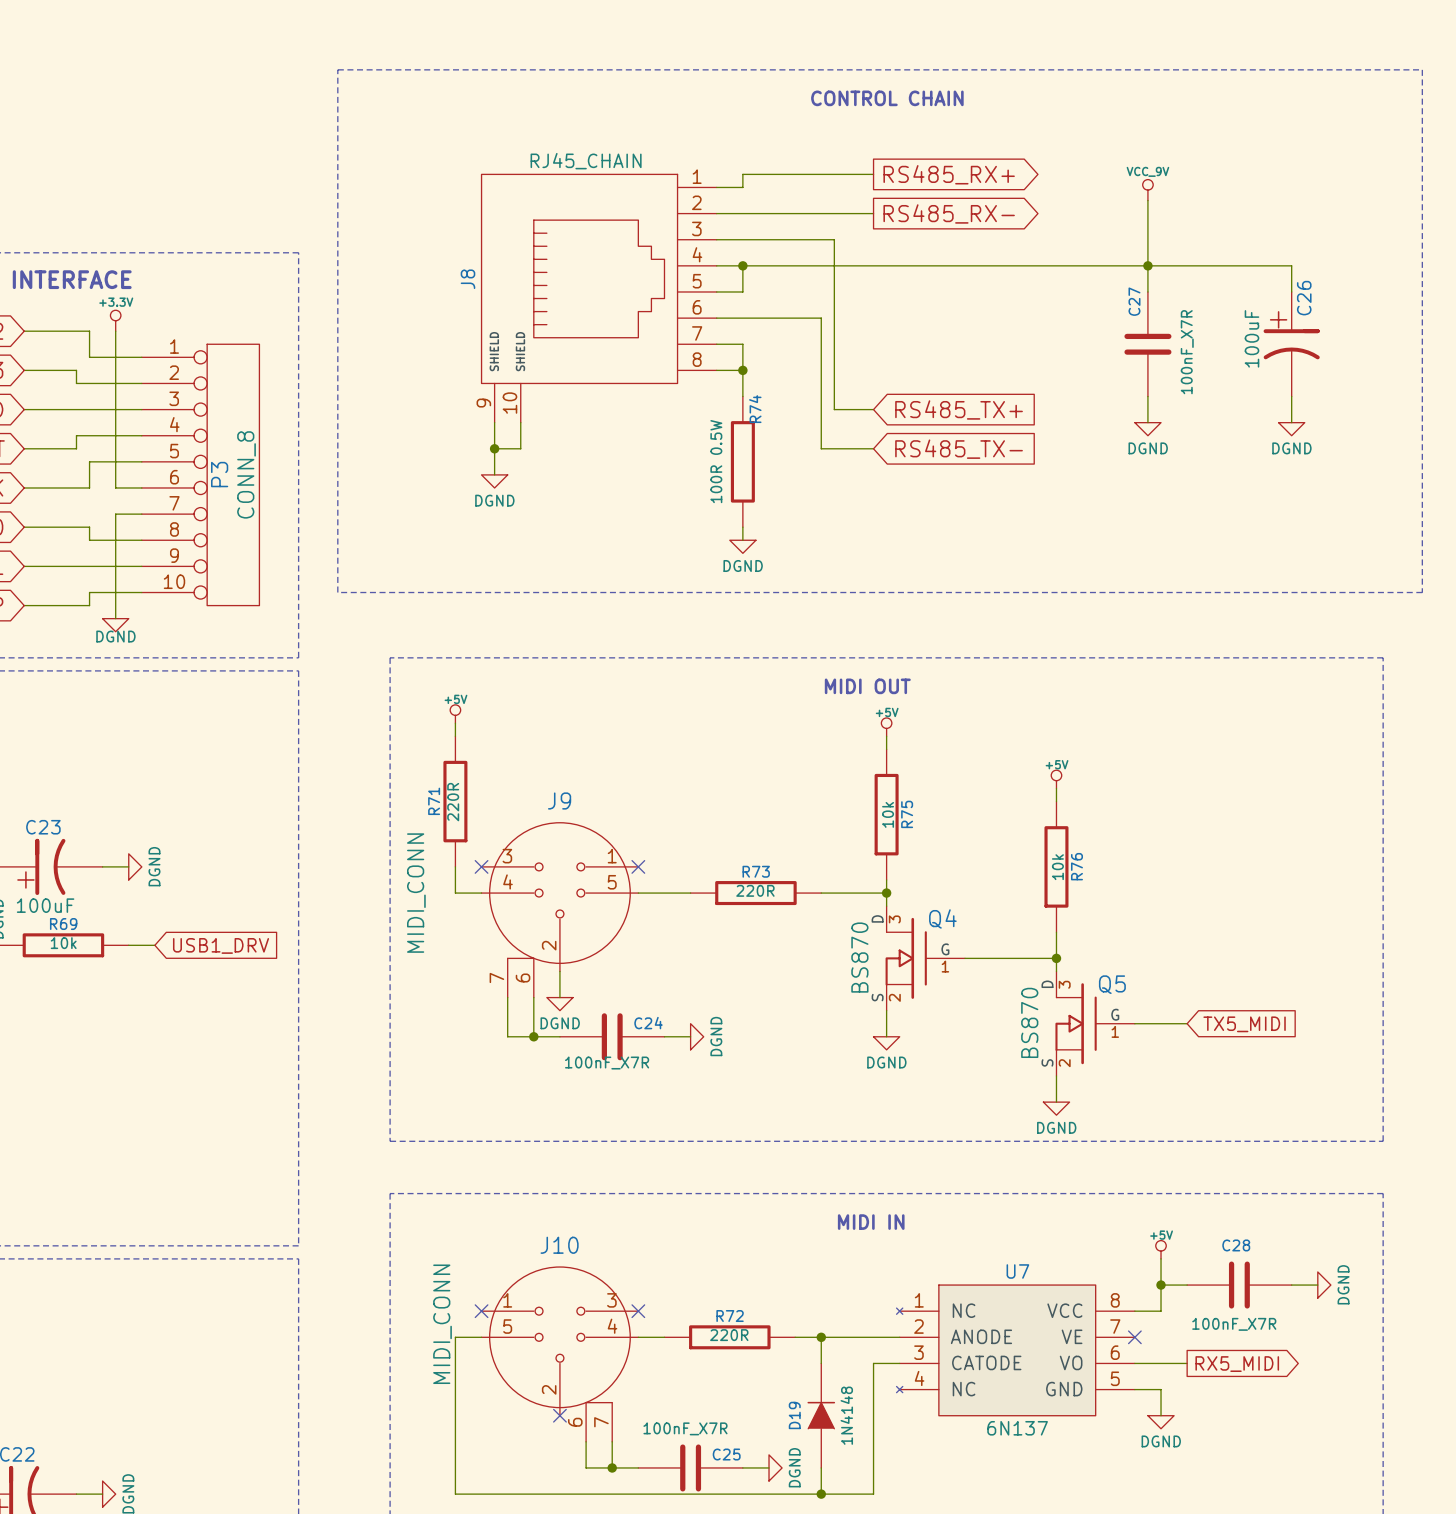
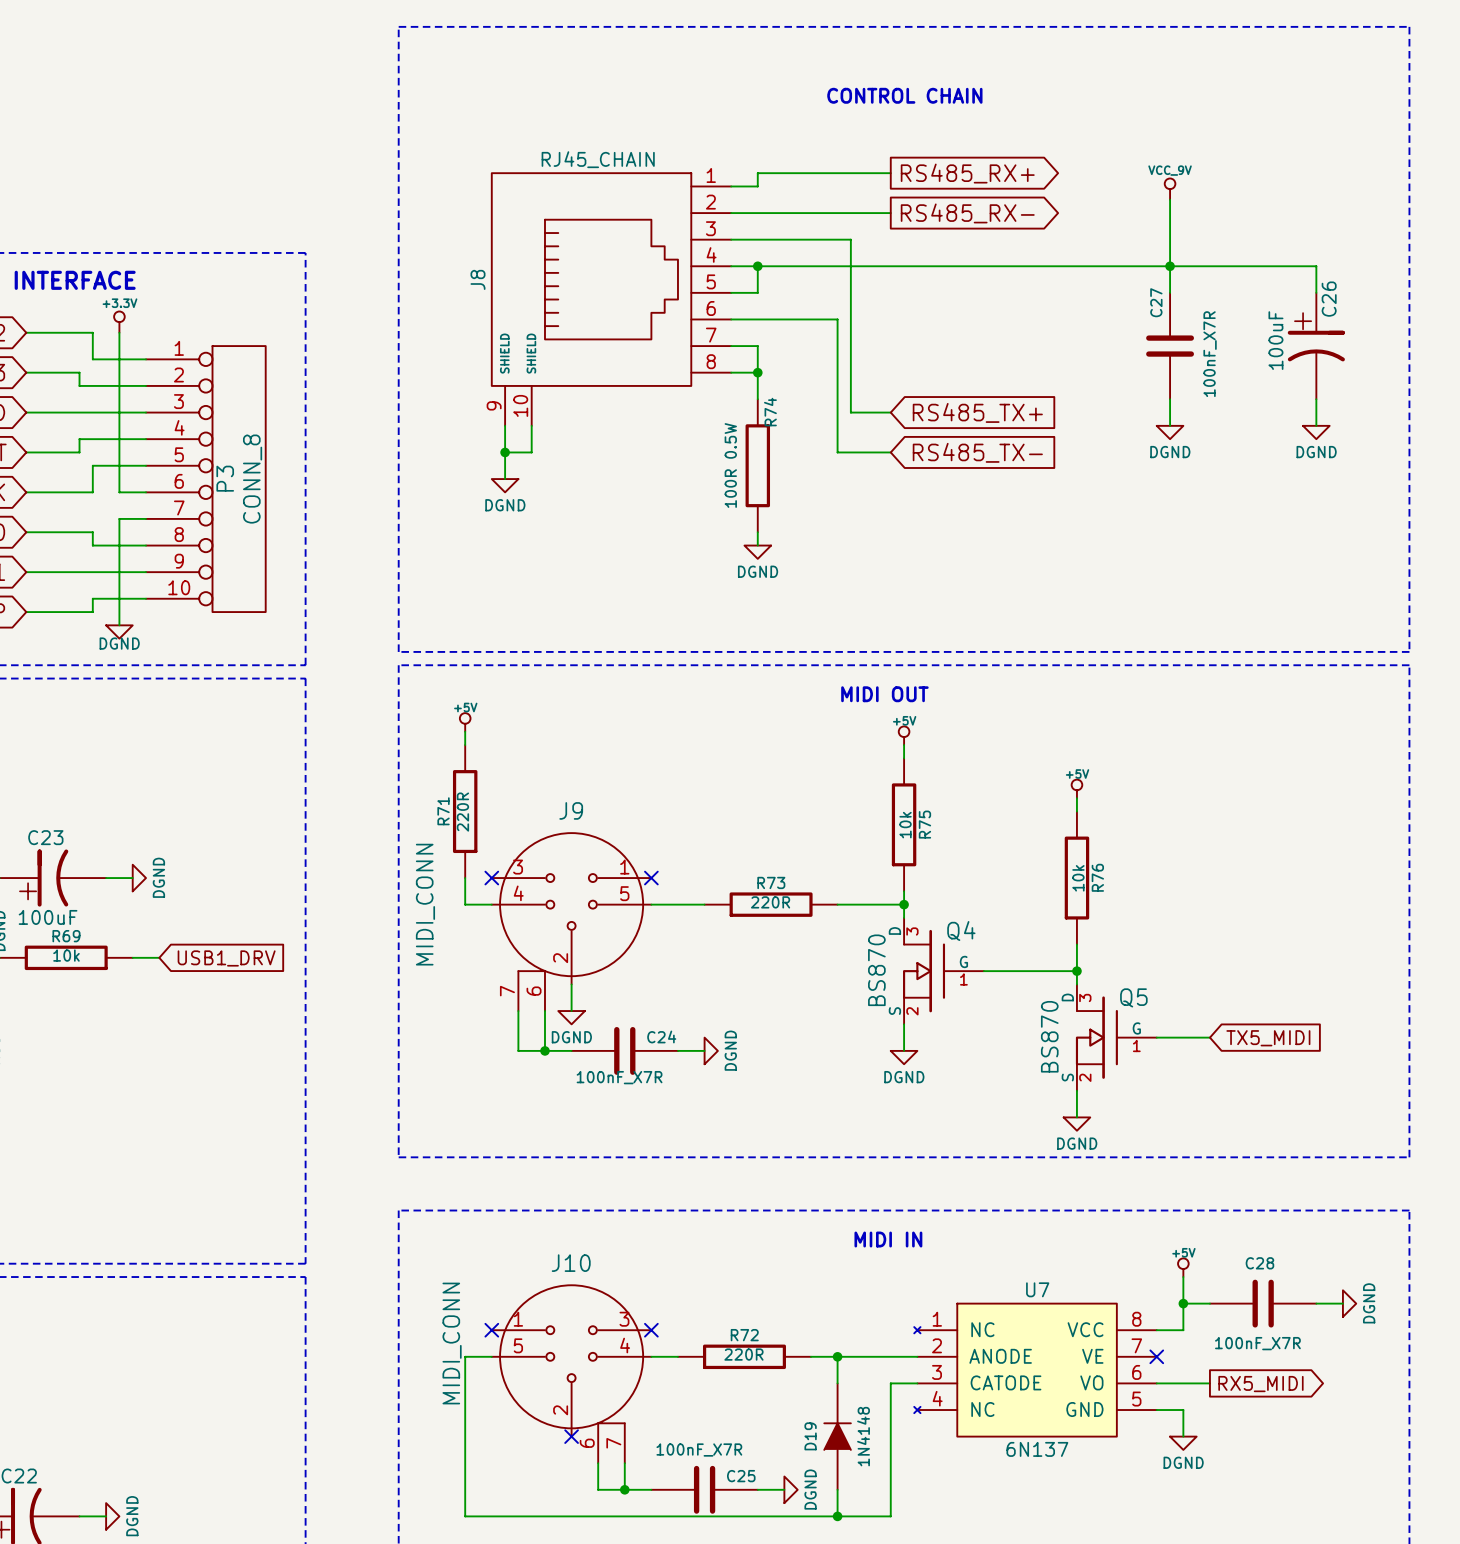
line: (337, 69) (337, 592) (1422, 592) (1422, 69) (337, 69) -> (398, 26) (398, 651) (1409, 651) (1409, 26) (398, 26)

